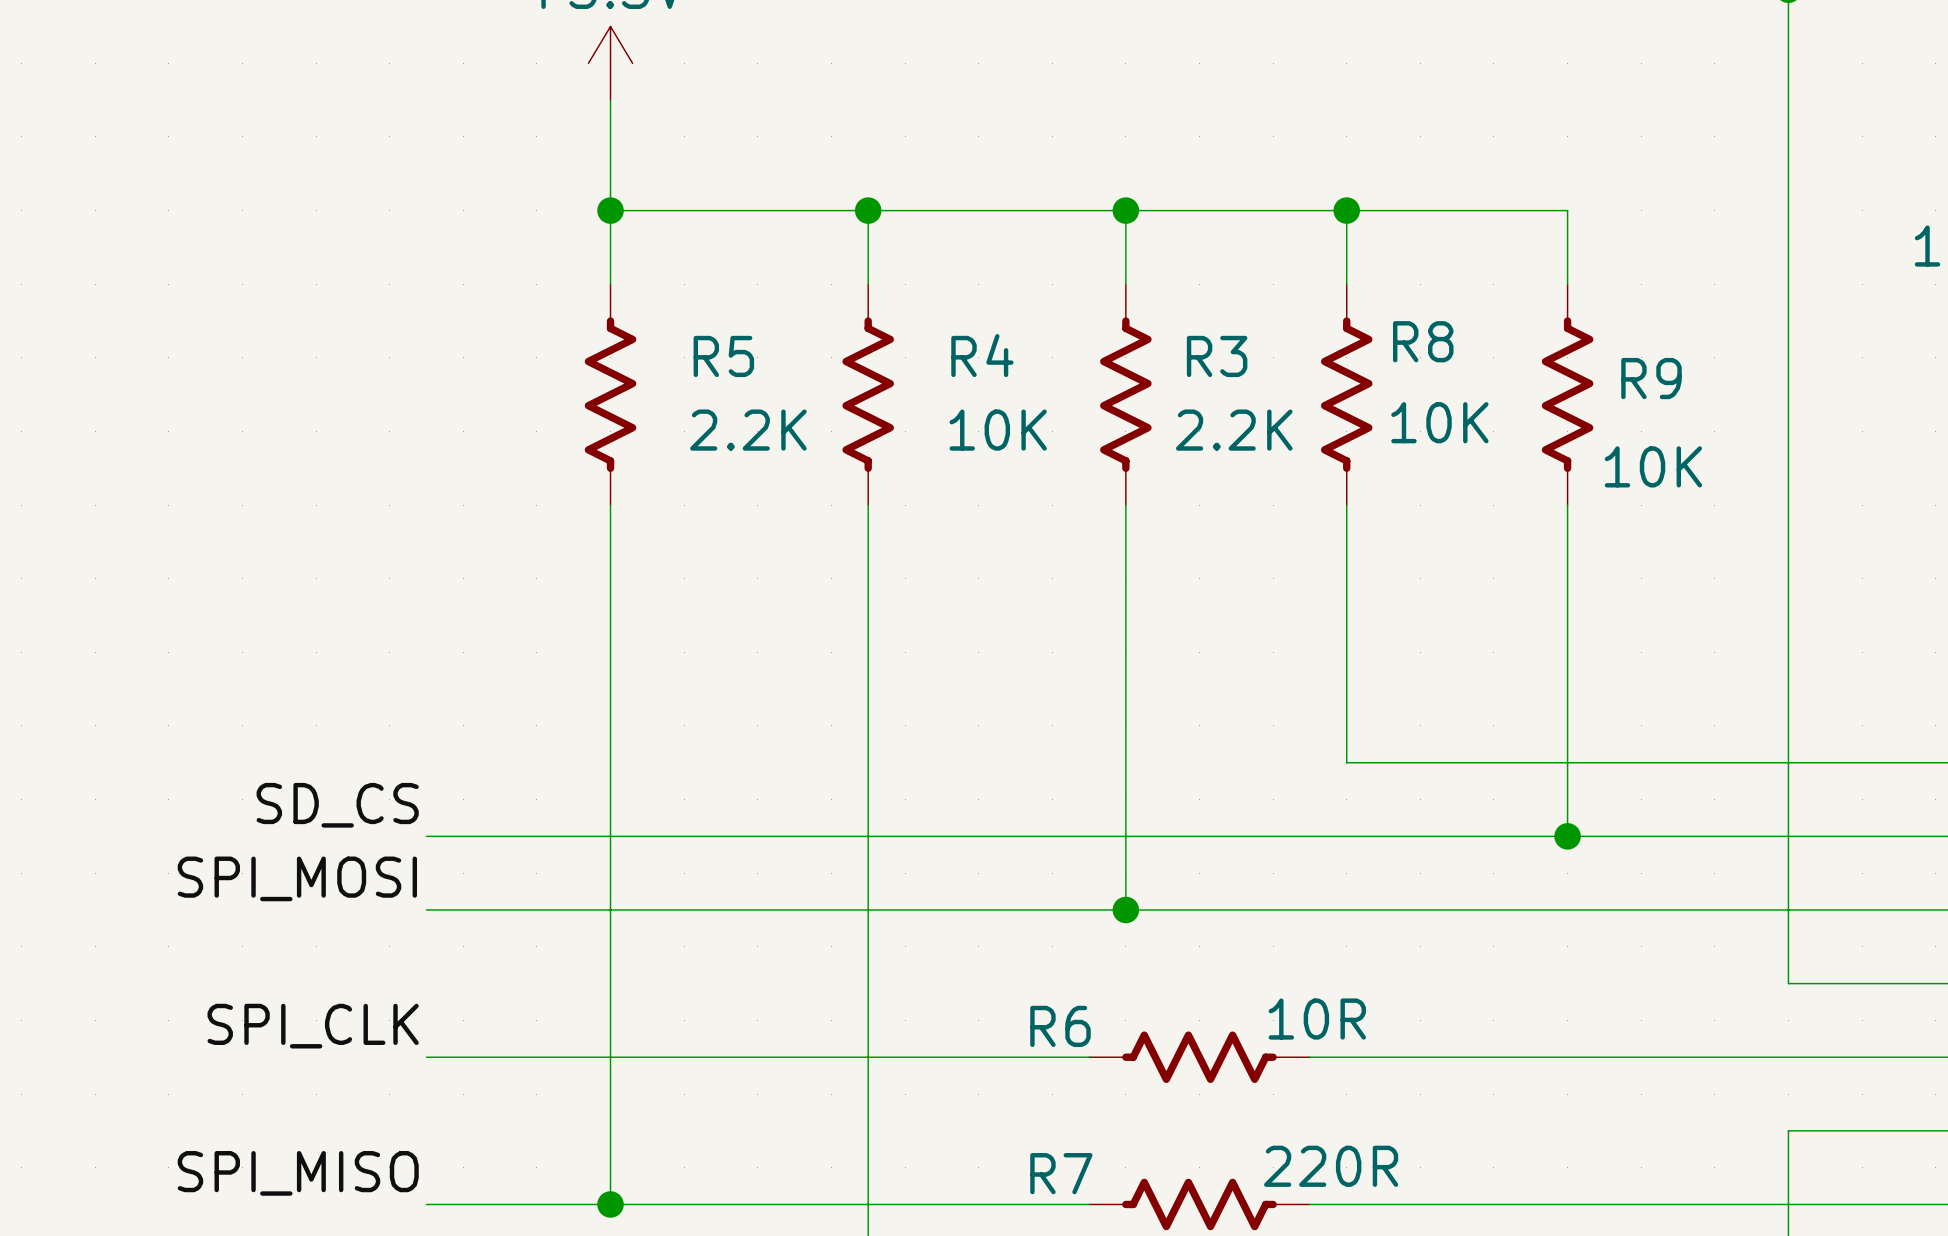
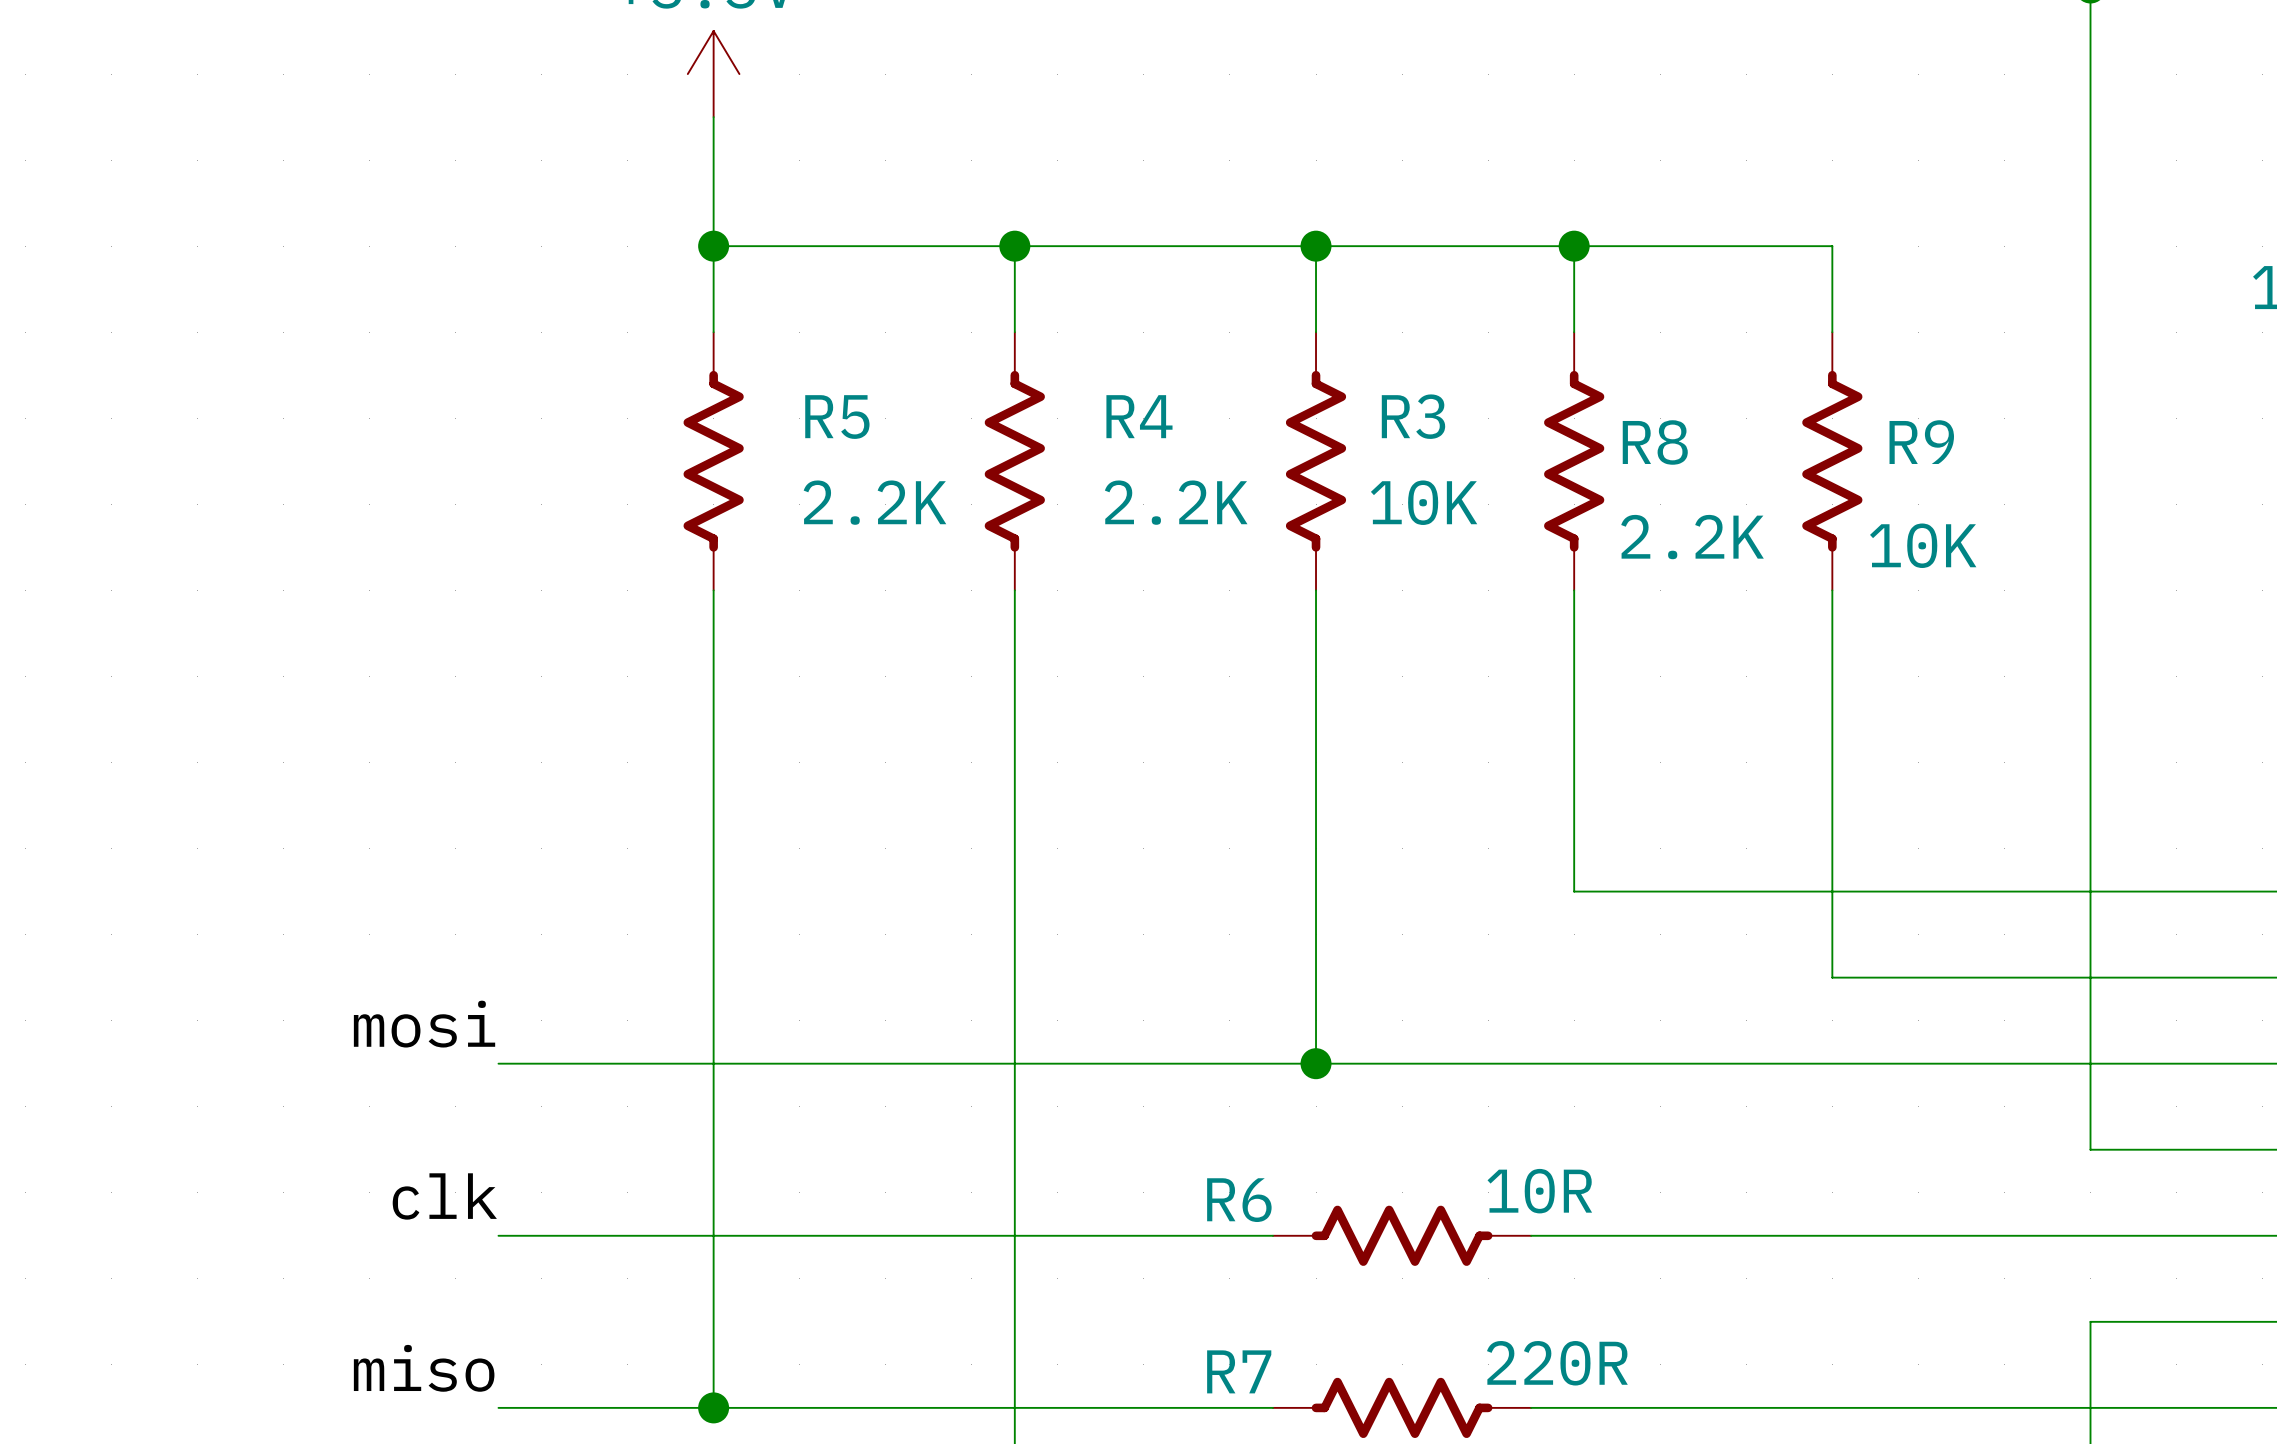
R8 name position: R8 (1423, 341) -> R8 (1655, 442)
R8 value: 10K (1439, 422) -> 2.2K (1692, 537)
R4 value: 10K (998, 430) -> 2.2K (1176, 502)
R3 value: 2.2K (1234, 430) -> 10K (1424, 502)
label: SD_CS (337, 805) -> none
wire: (426, 836) (1567, 836) -> none
junction: (1567, 836) -> none
label: SPI_MOSI (297, 878) -> mosi (424, 1024)
label: SPI_CLK (313, 1026) -> clk (444, 1196)
label: SPI_MISO (298, 1173) -> miso (424, 1368)

